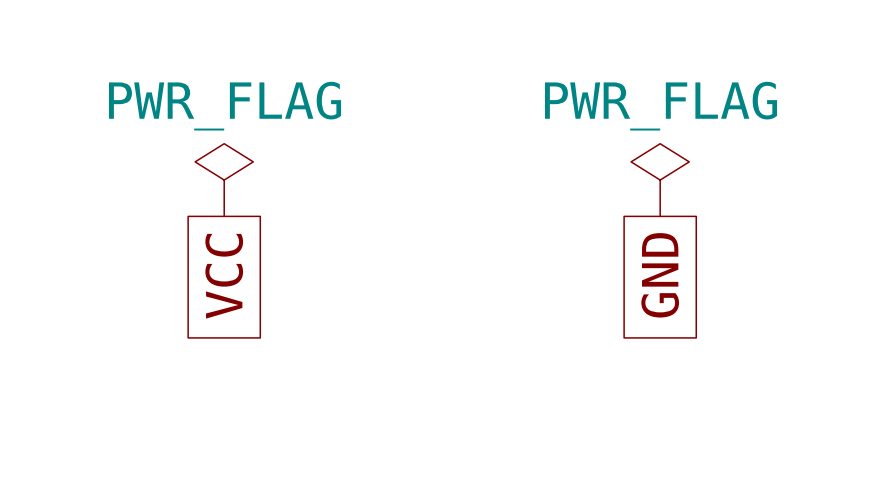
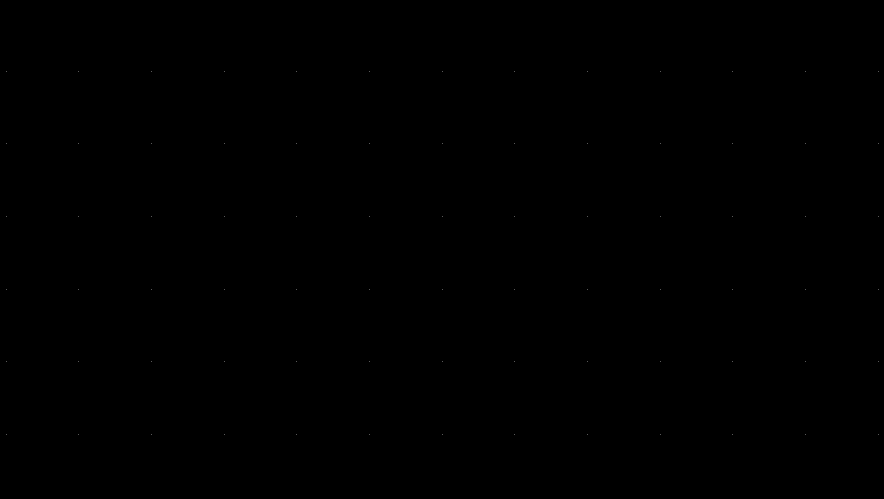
power symbol: PWR_FLAG (224, 180) -> none
power symbol: PWR_FLAG (660, 180) -> none
global label: GND (660, 275) -> none
global label: VCC (224, 276) -> none

